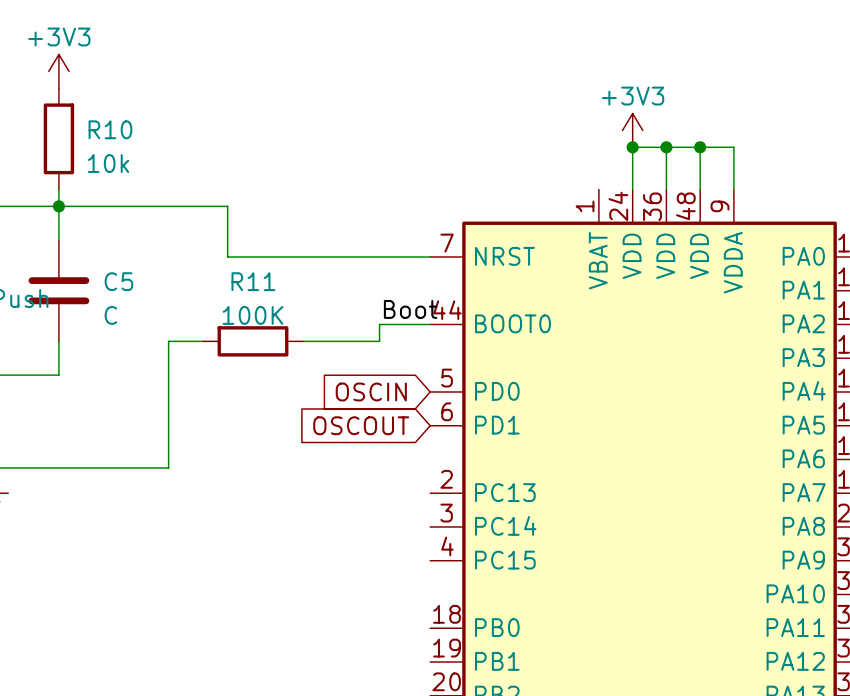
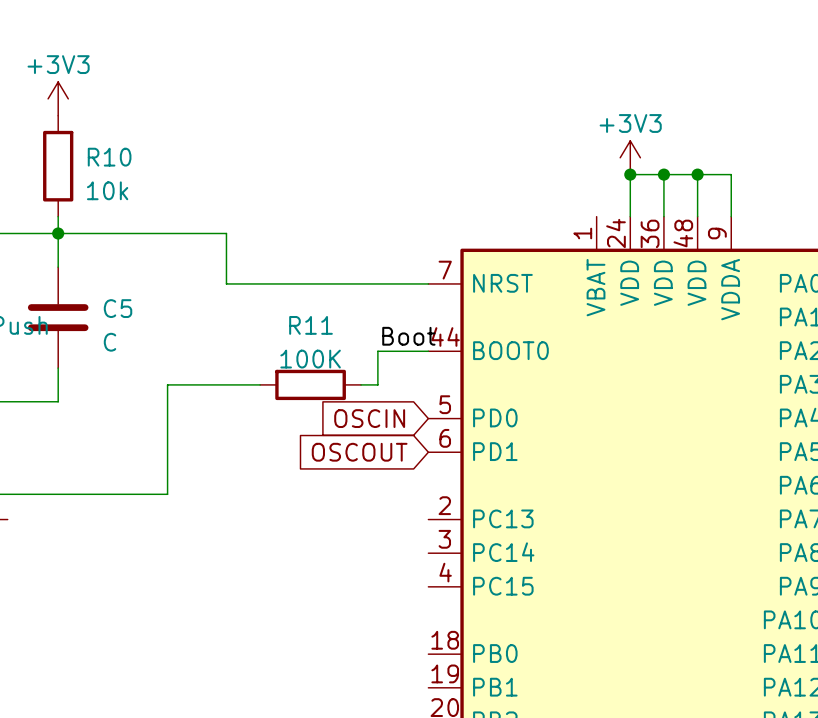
wire: (202, 341) (168, 341) (168, 358) -> (260, 384) (167, 384)
R11 position: (252, 341) -> (310, 384)
wire: (303, 341) (379, 341) -> (361, 384) (377, 384) (377, 368)

